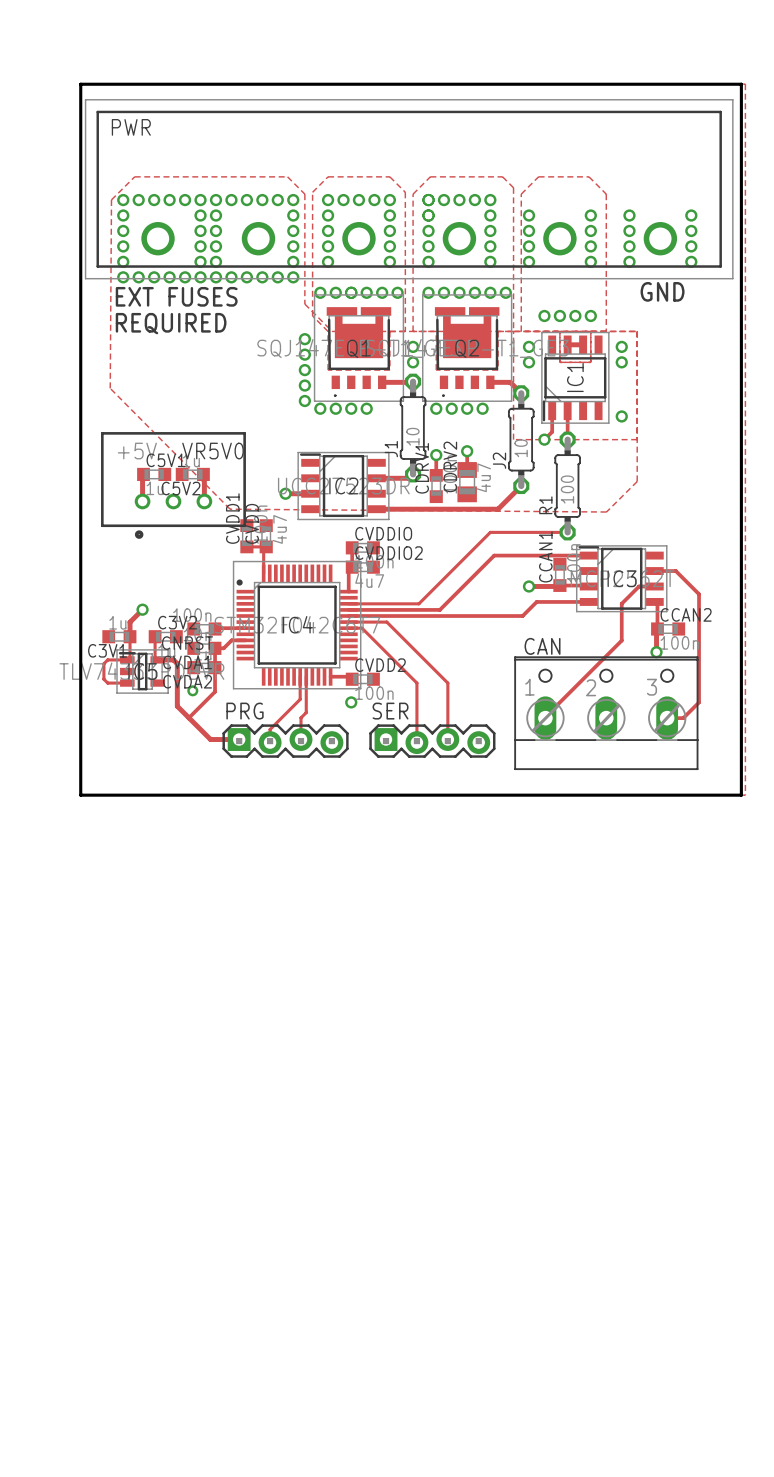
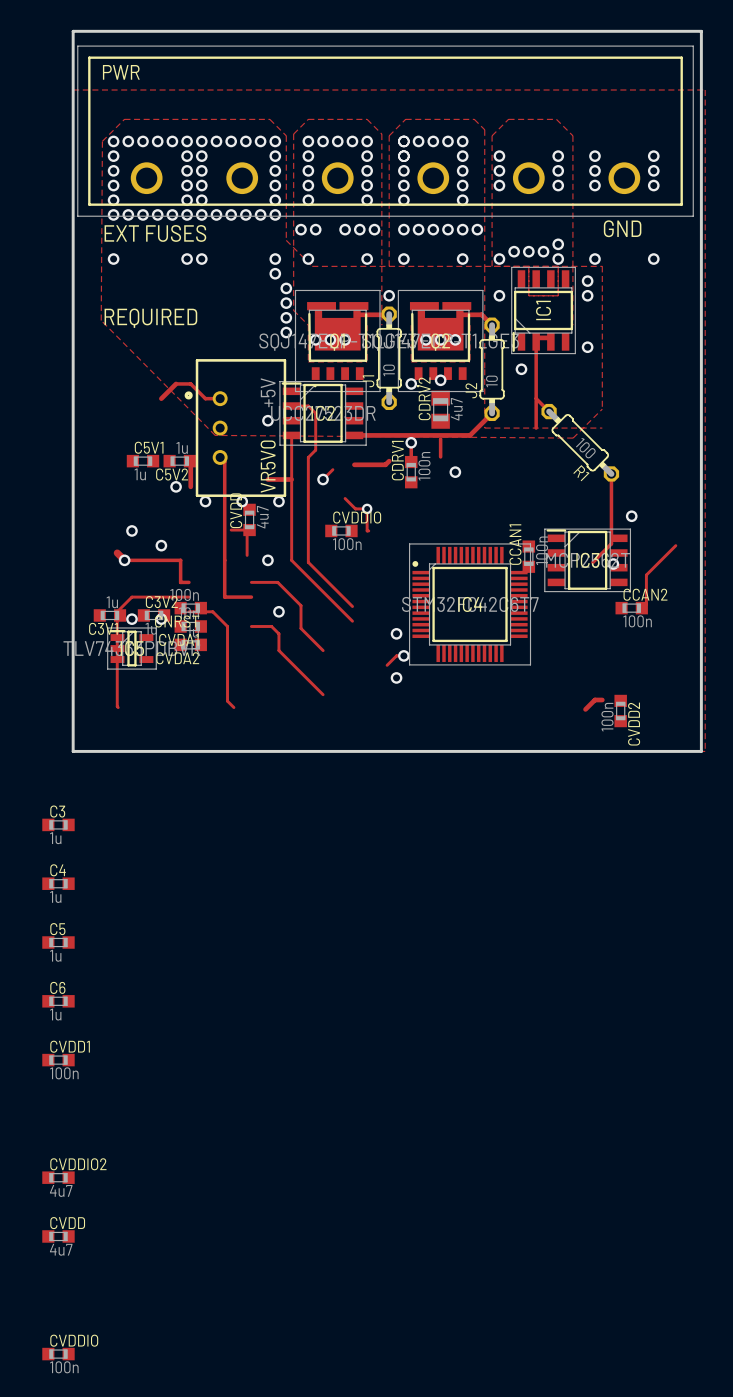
board edge: (80, 84) (741, 84) -> (73, 90) (73, 31) (701, 31) (701, 90)
via: none -> (113, 141)
via: none -> (128, 141)
via: none -> (142, 141)
via: none -> (157, 141)
via: none -> (172, 141)
via: none -> (187, 141)
via: none -> (201, 141)
via: none -> (216, 141)
via: none -> (231, 141)
via: none -> (245, 141)
via: none -> (260, 141)
via: none -> (275, 141)
via: none -> (308, 141)
via: none -> (323, 141)
via: none -> (337, 141)
via: none -> (352, 141)
via: none -> (367, 141)
via: none -> (403, 141)
via: none -> (418, 141)
via: none -> (433, 141)
via: none -> (447, 141)
via: none -> (462, 141)
via: none -> (113, 156)
via: none -> (187, 156)
via: none -> (201, 156)
via: none -> (275, 156)
via: none -> (308, 156)
via: none -> (367, 156)
via: none -> (403, 156)
via: none -> (462, 156)
via: none -> (499, 156)
via: none -> (558, 156)
via: none -> (594, 156)
via: none -> (653, 156)
via: none -> (113, 170)
via: none -> (187, 170)
via: none -> (201, 170)
via: none -> (275, 170)
via: none -> (308, 170)
via: none -> (367, 170)
via: none -> (403, 170)
via: none -> (462, 170)
via: none -> (499, 170)
via: none -> (558, 170)
via: none -> (594, 170)
via: none -> (653, 170)
via: none -> (113, 185)
via: none -> (187, 185)
via: none -> (201, 185)
via: none -> (275, 185)
via: none -> (308, 185)
via: none -> (367, 185)
via: none -> (403, 185)
via: none -> (462, 185)
via: none -> (499, 185)
via: none -> (558, 185)
via: none -> (594, 185)
via: none -> (653, 185)
zone outline: (513, 187) (502, 176) (430, 176) (413, 194) -> (484, 188) (484, 129) (474, 119) (405, 119) (389, 135) (389, 194)
PWR position: (409, 189) -> (385, 131)
zone outline: (312, 192) (328, 176) (389, 176) (405, 192) -> (293, 192) (293, 134) (308, 119) (367, 119) (381, 134) (381, 192)
zone outline: (304, 194) (287, 176) (134, 176) (111, 199) (110, 388) (230, 509) (606, 512) (637, 481) (637, 419) -> (286, 194) (286, 135) (269, 119) (124, 119) (102, 141) (101, 320) (215, 435) (573, 438) (602, 409)
zone outline: (521, 194) (538, 176) (589, 176) (606, 194) -> (492, 194) (492, 135) (508, 119) (556, 119) (572, 135) (572, 194)
via: (138, 200) -> none
via: (154, 200) -> none
via: (169, 200) -> none
via: (185, 200) -> none
via: (231, 200) -> none
via: (246, 200) -> none
via: (262, 200) -> none
via: (277, 200) -> none
via: (343, 200) -> none
via: (358, 200) -> none
via: (374, 200) -> none
via: (443, 200) -> none
via: (459, 200) -> none
via: (474, 200) -> none
via: none -> (128, 214)
via: none -> (142, 214)
via: none -> (157, 214)
via: none -> (172, 214)
via: none -> (216, 214)
via: none -> (231, 214)
via: none -> (245, 214)
via: none -> (260, 214)
via: (328, 215) -> none
via: (389, 215) -> none
via: (428, 215) -> none
via: (490, 215) -> none
via: (529, 215) -> none
via: (590, 215) -> none
via: (629, 215) -> none
via: (691, 215) -> none
via: (123, 230) -> none
via: (200, 230) -> none
via: (215, 230) -> none
via: (293, 230) -> none
via: none -> (301, 229)
via: (328, 230) -> none
via: none -> (315, 229)
via: none -> (345, 229)
via: none -> (359, 229)
via: (389, 230) -> none
via: none -> (374, 229)
via: none -> (418, 229)
via: none -> (433, 229)
via: none -> (447, 229)
via: none -> (477, 229)
via: (529, 230) -> none
via: (590, 230) -> none
via: (629, 230) -> none
via: (691, 230) -> none
zone outline: (304, 242) (304, 304) (332, 331) (637, 331) -> (286, 240) (312, 266) (602, 266) (602, 325)
via: (123, 246) -> none
via: (200, 246) -> none
via: (215, 246) -> none
via: (293, 246) -> none
via: (328, 246) -> none
via: (389, 246) -> none
via: (428, 246) -> none
via: (490, 246) -> none
via: (529, 246) -> none
via: (629, 246) -> none
via: (691, 246) -> none
via: none -> (514, 251)
via: none -> (528, 251)
via: none -> (543, 251)
zone outline: (413, 269) (413, 331) -> none
zone outline: (521, 269) (521, 331) -> none
via: (123, 277) -> none
via: (138, 277) -> none
via: (154, 277) -> none
via: (169, 277) -> none
via: (185, 277) -> none
via: (200, 277) -> none
via: (215, 277) -> none
via: (231, 277) -> none
via: (246, 277) -> none
via: (262, 277) -> none
via: (277, 277) -> none
via: none -> (587, 281)
text position: GND (662, 291) -> GND (622, 228)
via: none -> (286, 288)
via: (320, 292) -> none
via: (335, 292) -> none
via: (351, 292) -> none
via: (366, 292) -> none
via: (382, 292) -> none
via: (397, 292) -> none
via: (428, 292) -> none
via: (443, 292) -> none
via: (459, 292) -> none
via: (474, 292) -> none
via: (490, 292) -> none
via: (505, 292) -> none
text position: EXT FUSES (176, 296) -> EXT FUSES (155, 233)
via: none -> (389, 295)
via: none -> (499, 295)
via: none -> (587, 295)
via: none -> (286, 303)
via: (544, 315) -> none
via: (559, 315) -> none
via: (575, 315) -> none
via: (590, 315) -> none
via: none -> (286, 317)
zone outline: (559, 331) (559, 362) (590, 362) (590, 331) -> (528, 266) (528, 295) (558, 295) (558, 266)
via: none -> (315, 339)
via: none -> (330, 339)
via: none -> (345, 339)
via: (413, 346) -> none
via: none -> (425, 339)
via: none -> (440, 339)
via: none -> (455, 339)
via: (529, 346) -> none
via: (621, 346) -> none
track: none -> (536, 341) (536, 398) (549, 411)
via: (304, 354) -> none
via: none -> (587, 347)
via: (413, 362) -> none
via: (529, 362) -> none
via: (621, 362) -> none
via: (304, 370) -> none
via: none -> (521, 369)
IC1 position: (575, 377) -> (543, 310)
track: (413, 381) (382, 382) -> (389, 314) (359, 314)
track: (490, 382) (510, 382) (521, 393) -> (462, 314) (481, 314) (492, 325)
via: (304, 385) -> none
via: none -> (440, 380)
via: none -> (411, 383)
via: (304, 401) -> none
track: none -> (161, 398) (176, 383) (190, 383) (205, 398) (220, 398)
via: (320, 408) -> none
via: (335, 408) -> none
via: (351, 408) -> none
via: (366, 408) -> none
via: (436, 408) -> none
via: (451, 408) -> none
via: (467, 408) -> none
via: (482, 408) -> none
track: (552, 410) (552, 431) (544, 439) -> none
track: none -> (291, 406) (308, 406) (315, 413) (315, 450) (308, 457) (308, 562) (352, 606)
via: (621, 416) -> none
J1 position: (413, 428) -> (389, 358)
via: none -> (267, 420)
J2 position: (521, 439) -> (492, 369)
via: (544, 439) -> none
track: none -> (291, 435) (291, 560) (352, 621)
via: (467, 451) -> none
track: none -> (220, 457) (224, 462) (224, 597) (251, 597)
track: (143, 474) (142, 501) -> none
CDRV2 position: (467, 482) -> (440, 409)
track: none -> (332, 469) (323, 479)
VR5V0 rotation: 0° (173, 485) -> 90° clockwise (235, 428)
VR5V0 position: (173, 485) -> (235, 428)
IC2 position: (343, 486) -> (323, 413)
via: none -> (455, 472)
track: (521, 486) (498, 509) (376, 509) -> (492, 413) (470, 435) (354, 435)
R1 rotation: 0° (567, 486) -> 45° counterclockwise (580, 442)
track: none -> (611, 473) (611, 543) (592, 562)
via: (285, 493) -> none
via: none -> (323, 479)
via: none -> (176, 486)
track: none -> (345, 498) (355, 508) (367, 508) (367, 530) (368, 530)
via: none -> (205, 501)
via: none -> (242, 501)
via: none -> (278, 501)
via: none -> (367, 508)
track: (567, 532) (490, 532) (418, 603) (348, 603) -> none
via: none -> (631, 516)
CVDD1 rotation: 0° (246, 536) -> 90° clockwise (58, 1060)
CVDD1 position: (246, 536) -> (58, 1060)
via: none -> (131, 530)
track: (352, 547) (352, 567) (348, 570) (348, 591) -> none
track: (588, 555) (494, 555) (439, 609) (348, 609) -> none
via: none -> (161, 545)
track: none -> (675, 545) (646, 575) (646, 604) (643, 607)
CVDDIO2 position: (362, 567) -> (58, 1177)
track: none -> (117, 553) (124, 560) (180, 560) (180, 582) (188, 582)
track: (654, 571) (675, 571) (699, 594) (699, 702) (683, 718) (667, 718) -> none
via: none -> (124, 560)
via: none -> (267, 560)
via: none -> (613, 564)
track: (529, 586) (588, 586) -> none
via: (529, 586) -> none
track: (654, 586) (639, 586) (621, 603) (621, 640) (545, 718) -> none
track: none -> (251, 582) (277, 582) (301, 605) (301, 628) (323, 650)
track: (588, 601) (536, 601) (522, 616) (348, 616) -> none
track: (654, 601) (657, 604) (656, 652) -> none
track: (142, 609) (130, 622) (130, 657) (127, 659) (107, 659) (103, 663) (103, 679) (107, 683) (127, 683) -> none
via: (142, 609) -> none
track: none -> (188, 597) (131, 597) (117, 611) (118, 707)
track: (348, 622) (386, 622) (447, 683) (447, 739) -> none
IC4 position: (297, 625) -> (470, 604)
track: (245, 628) (215, 629) -> none
track: (348, 628) (362, 628) (416, 683) (416, 742) -> none
track: none -> (188, 611) (212, 611) (227, 626) (227, 701) (233, 707)
via: none -> (278, 611)
track: (155, 636) (155, 657) (157, 659) (173, 659) (177, 663) (177, 706) (210, 739) (239, 739) -> none
via: none -> (131, 619)
via: none -> (161, 619)
track: (245, 640) (231, 640) (223, 648) (215, 648) (215, 691) (188, 717) -> none
track: none -> (251, 626) (271, 626) (278, 633) (278, 650) (323, 694)
via: (656, 652) -> none
via: none -> (396, 633)
track: (300, 676) (300, 699) (270, 729) (270, 742) -> none
track: (306, 676) (306, 712) (301, 717) (301, 739) -> none
track: (330, 676) (349, 676) (351, 679) -> none
CVDD2 rotation: 0° (362, 679) -> 90° clockwise (620, 711)
CVDD2 position: (362, 679) -> (620, 711)
track: none -> (403, 655) (396, 655) (387, 665)
via: none -> (403, 655)
via: (192, 690) -> none
via: (351, 702) -> none
via: none -> (396, 677)
CAN: (606, 713) -> none
track: none -> (602, 699) (594, 699) (585, 709)
PRG: (285, 741) -> none
SER: (432, 741) -> none
board edge: (80, 779) (80, 795) (741, 795) (741, 779) -> (73, 751) (701, 751)
C3: none -> 1u (58, 824)
C4: none -> 1u (58, 883)
C5: none -> 1u (58, 942)
C6: none -> 1u (58, 1001)
CVDD: none -> 4u7 (58, 1236)
CVDDIO: none -> 100n (58, 1354)

